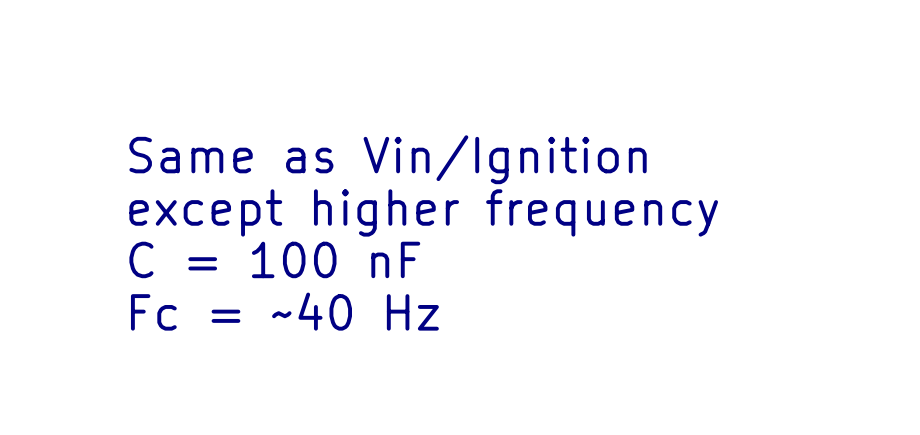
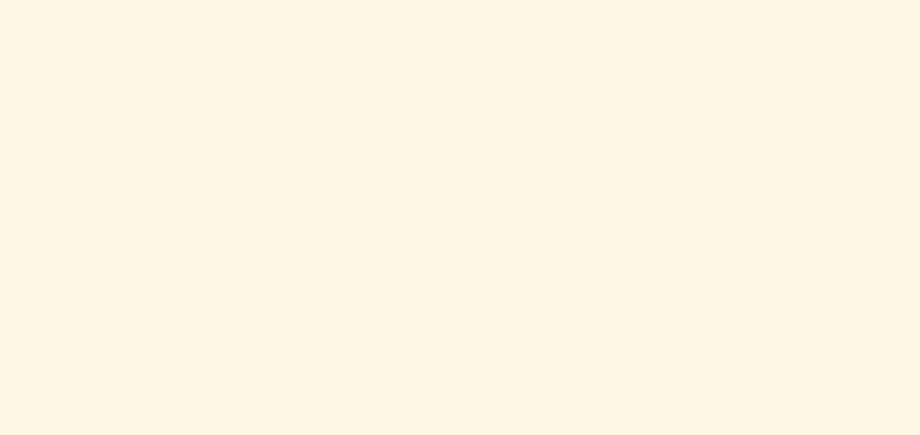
text: Same as Vin/Ignition (388, 159) -> none
text: except higher frequency (423, 212) -> none
text: C = 100 nF (274, 259) -> none
text: Fc = ~40 Hz (284, 311) -> none

